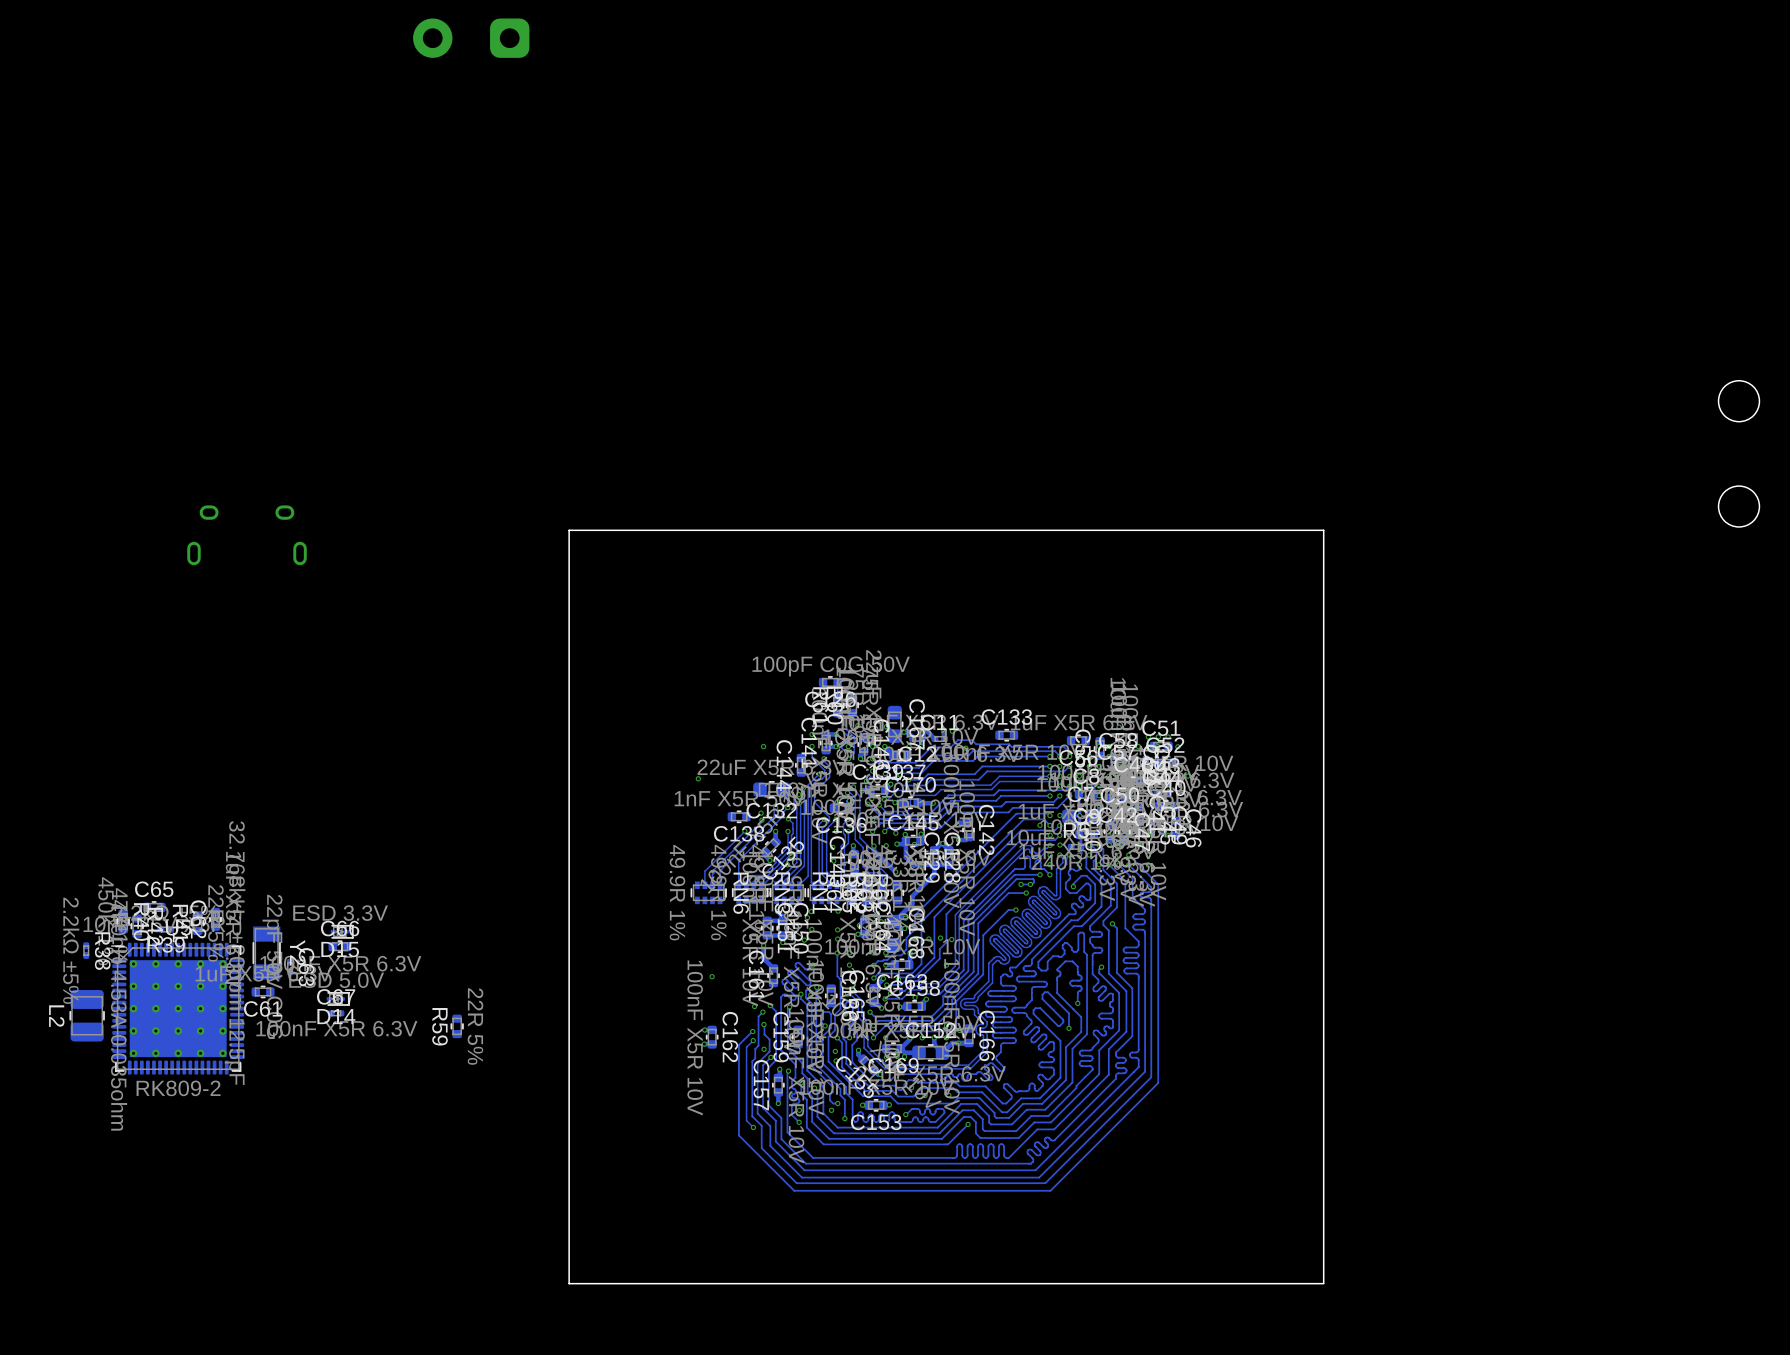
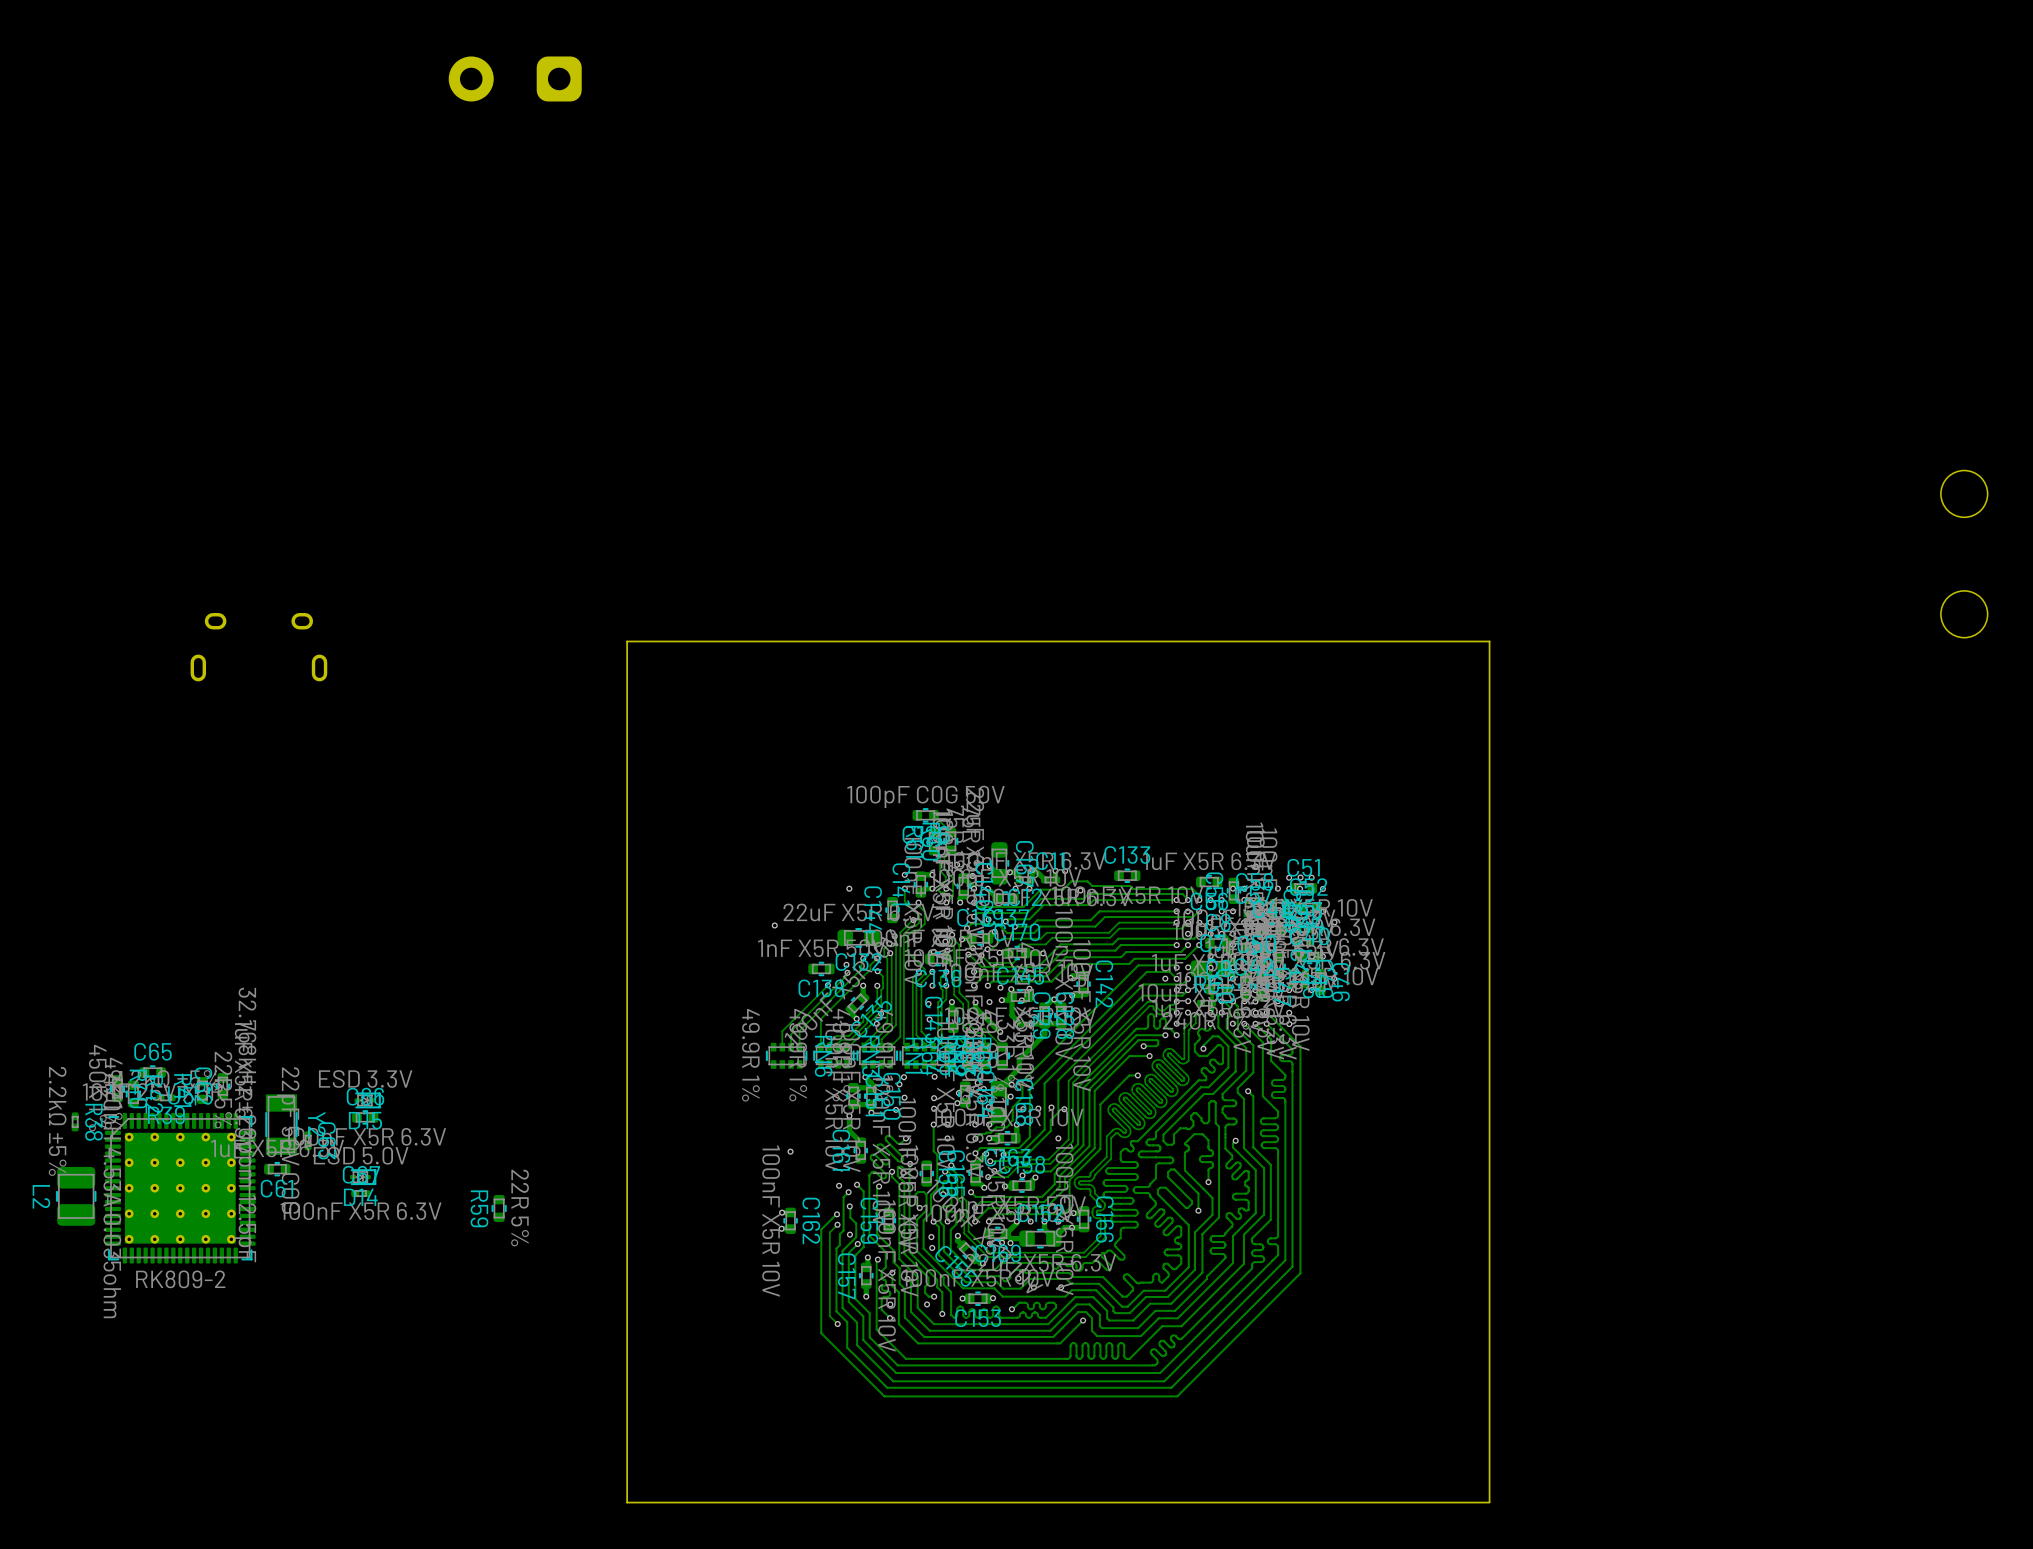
via: (1030, 884) -> none

